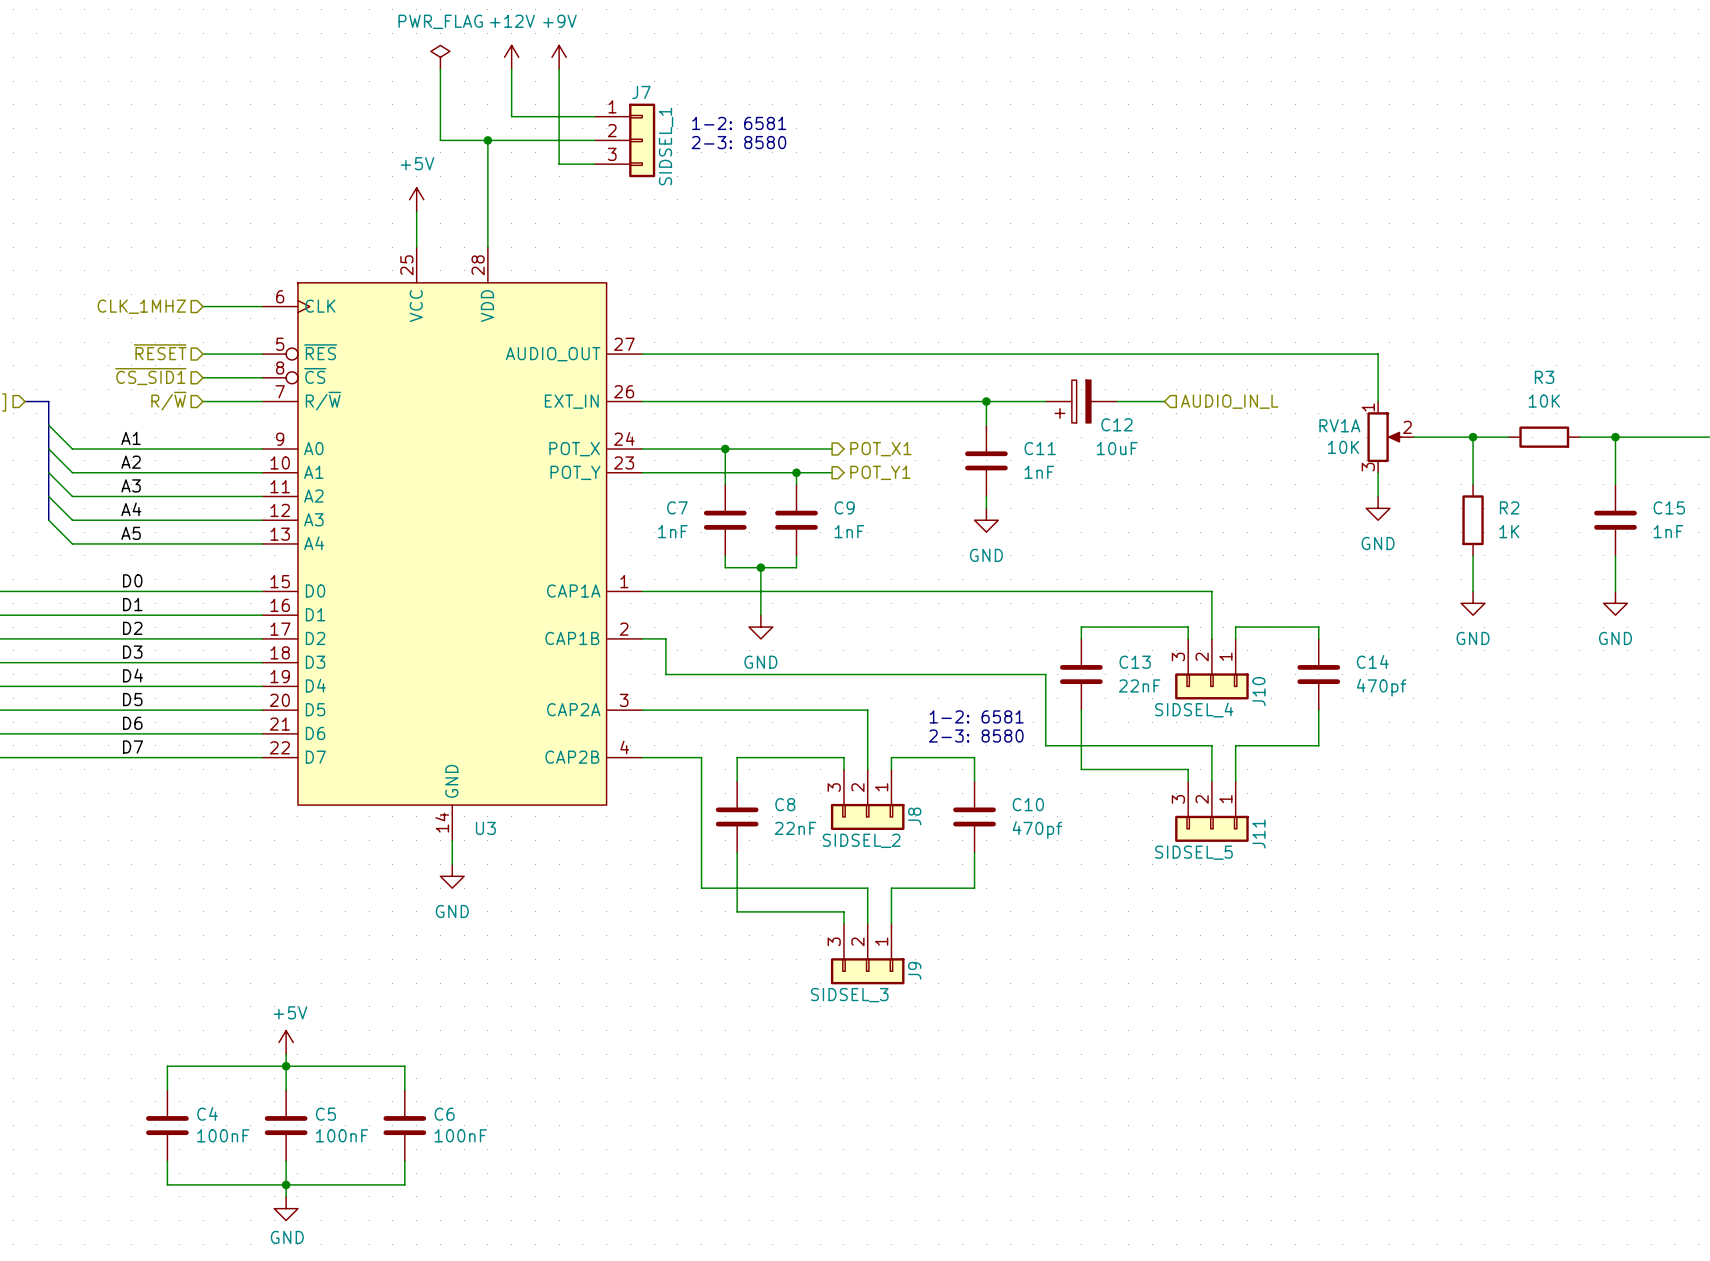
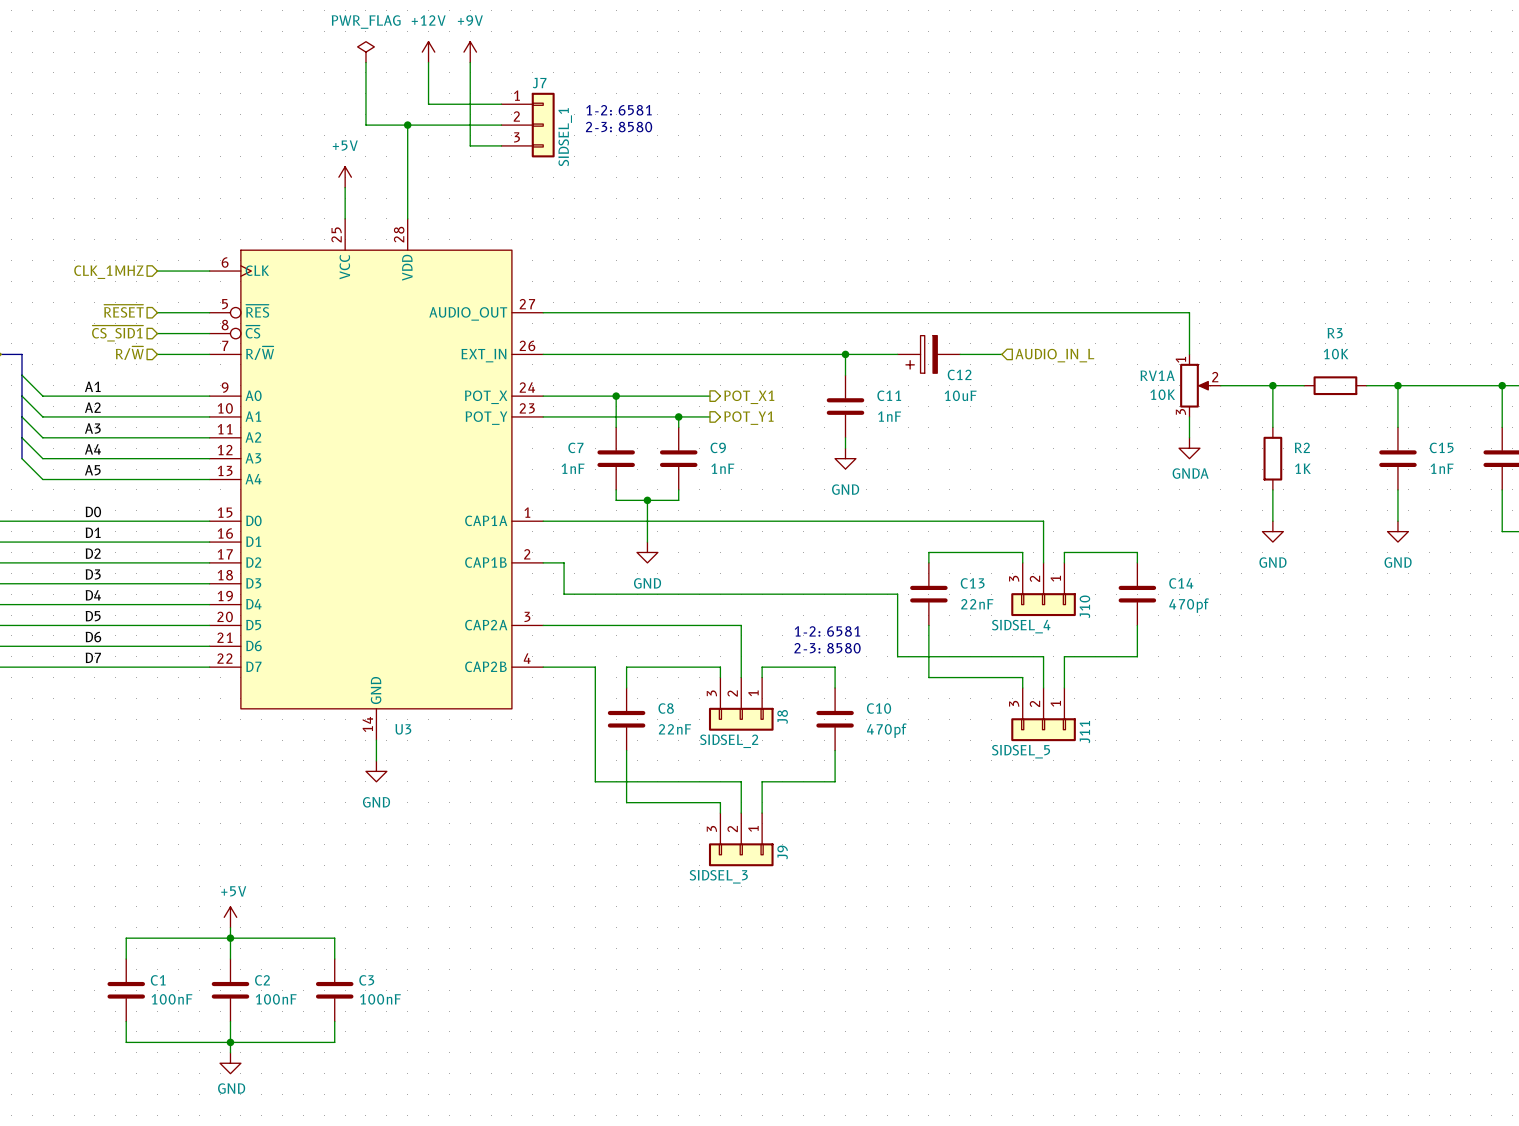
power symbol: GND (1378, 508) -> GNDA (1189, 448)
C4 name: C4 (207, 1113) -> C1 (158, 980)
C5 name: C5 (325, 1114) -> C2 (262, 980)
C6 name: C6 (444, 1114) -> C3 (366, 980)

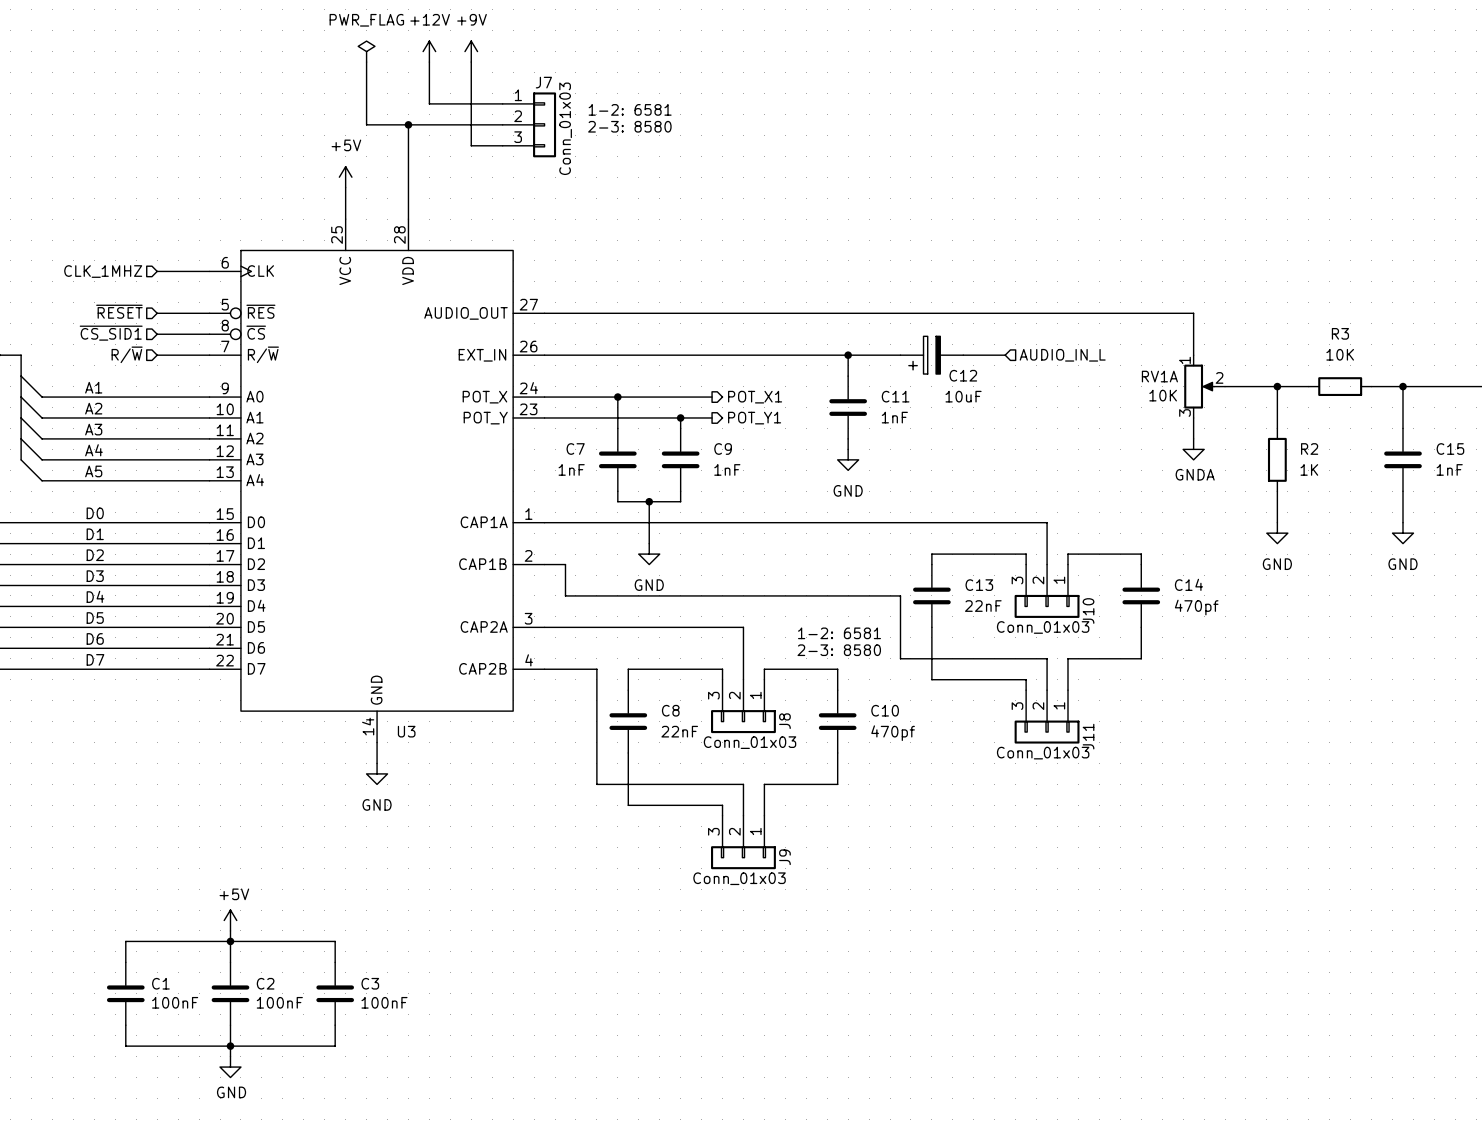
J7 value: SIDSEL_1 (565, 137) -> Conn_01x03 (565, 128)
J10 value: SIDSEL_4 (1021, 626) -> Conn_01x03 (1043, 627)
J8 value: SIDSEL_2 (729, 741) -> Conn_01x03 (750, 742)
J11 value: SIDSEL_5 (1021, 751) -> Conn_01x03 (1043, 753)
J9 value: SIDSEL_3 (718, 876) -> Conn_01x03 (739, 878)

